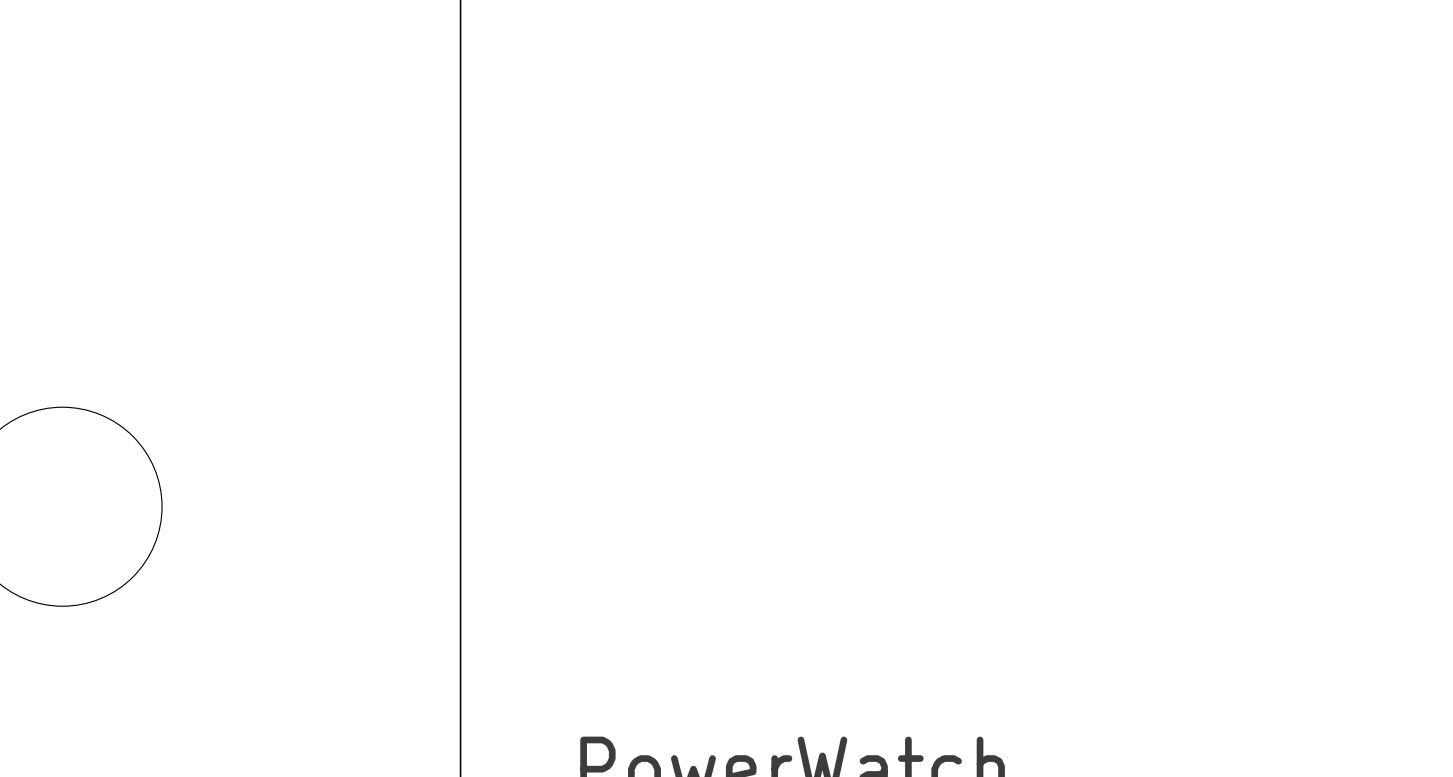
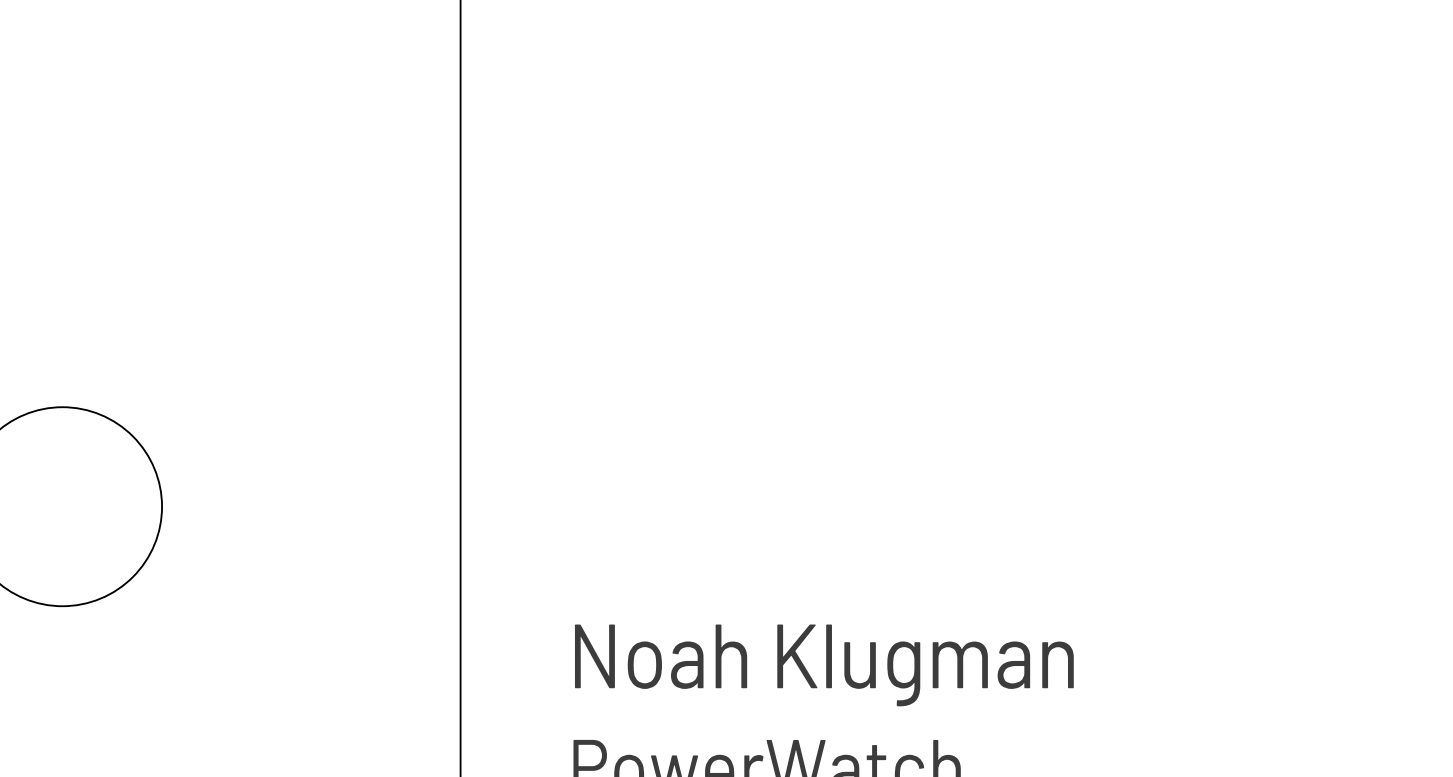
text: none -> Noah Klugman (824, 665)

